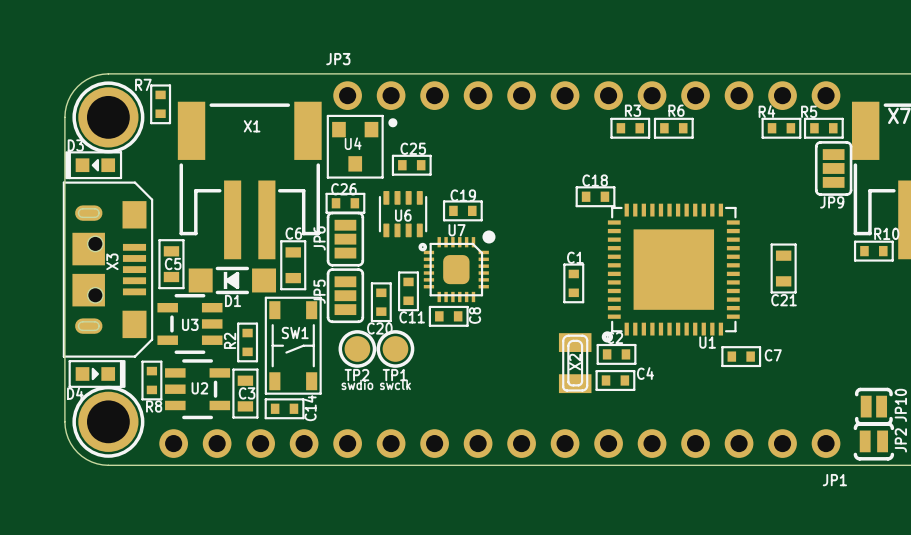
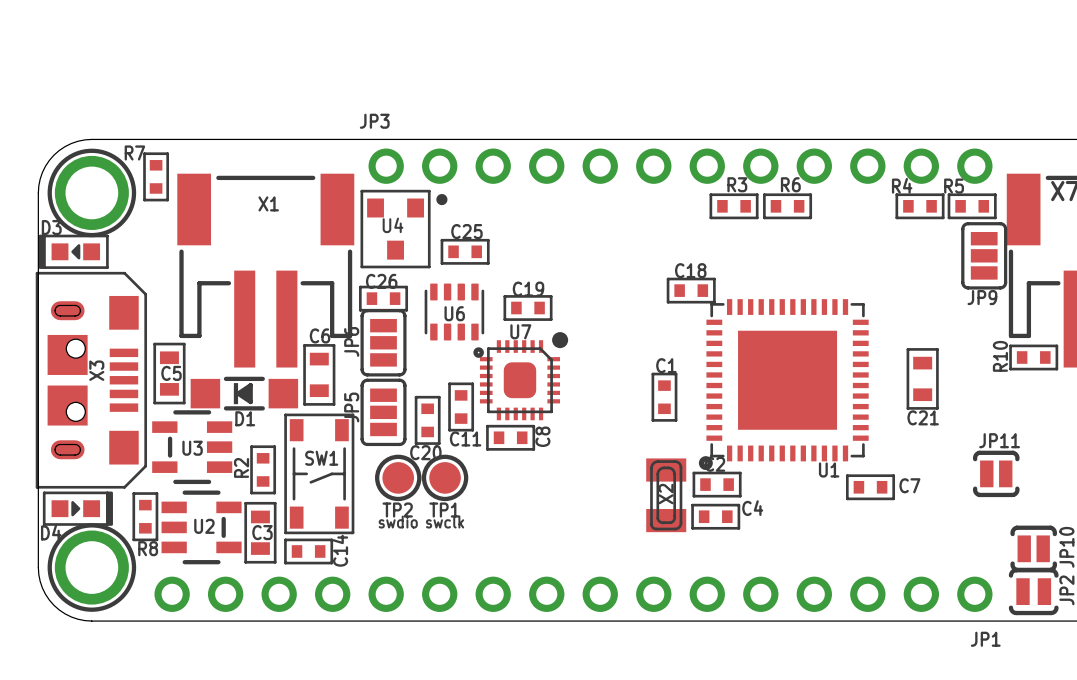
R10 name rotation: 0° (886, 233) -> 90° counterclockwise (1000, 356)
R10 name position: R10 (886, 233) -> R10 (1000, 356)
JP11: none -> (996, 473)

